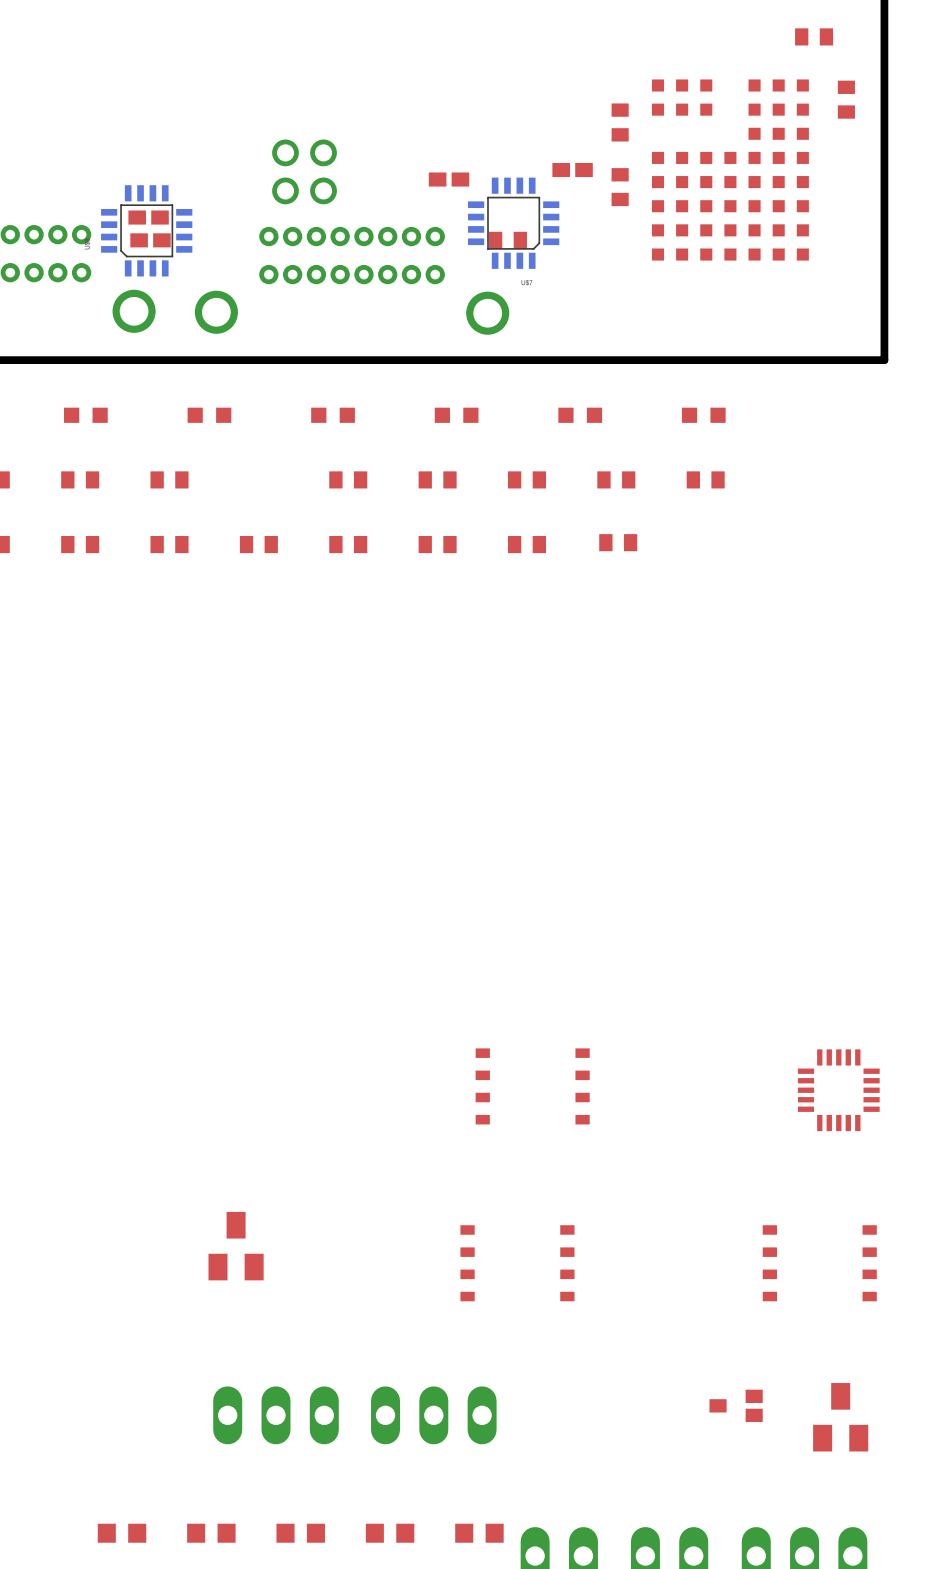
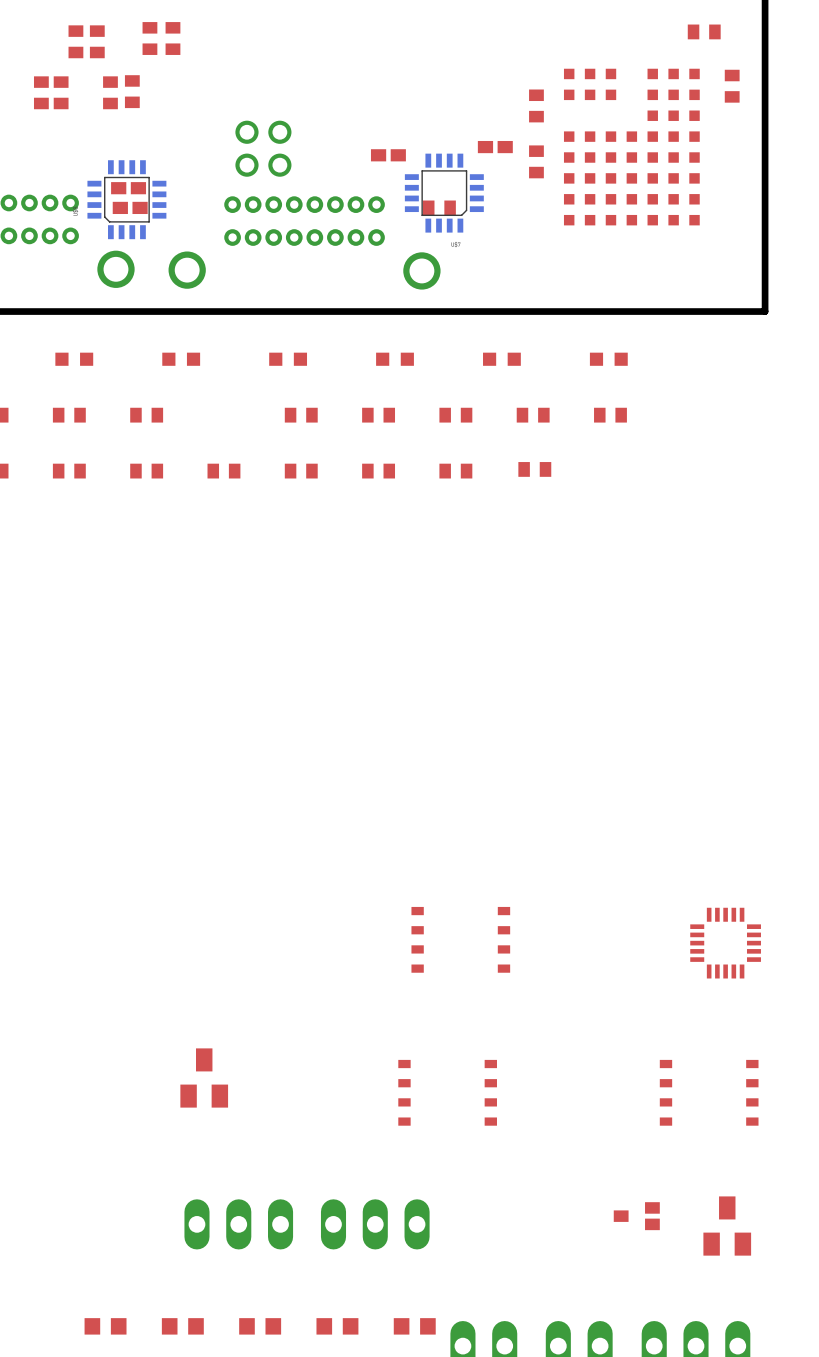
part: none -> (149, 38)
part: none -> (172, 38)
part: none -> (75, 41)
part: none -> (97, 41)
part: none -> (132, 91)
part: none -> (41, 92)
part: none -> (61, 92)
part: none -> (110, 92)

